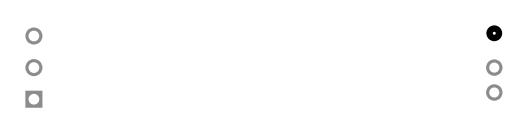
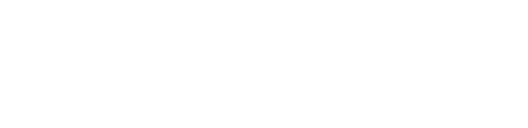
part: (494, 63) -> none
part: (33, 67) -> none

